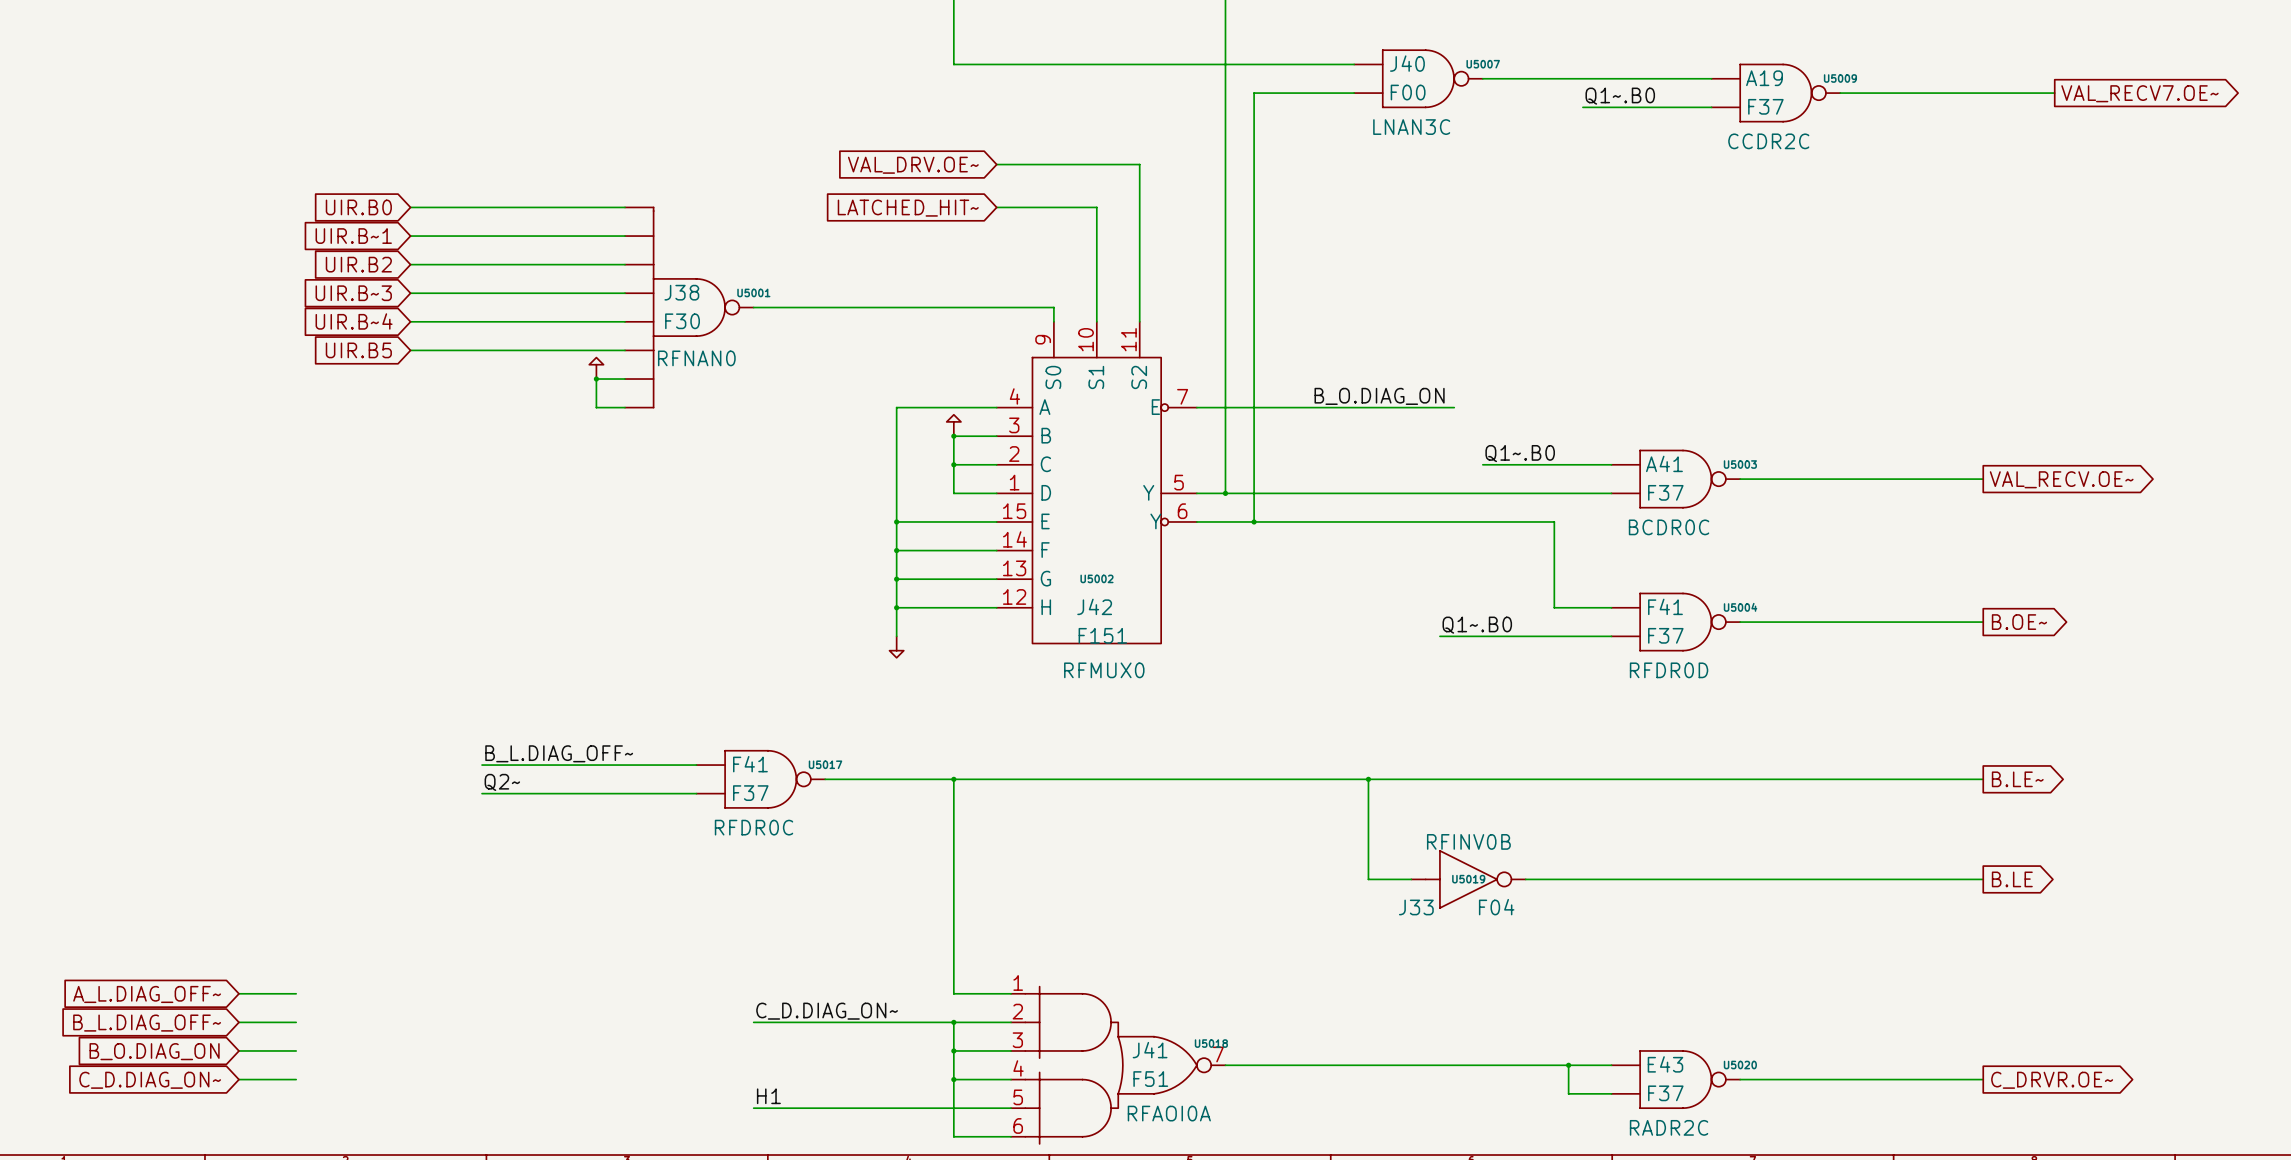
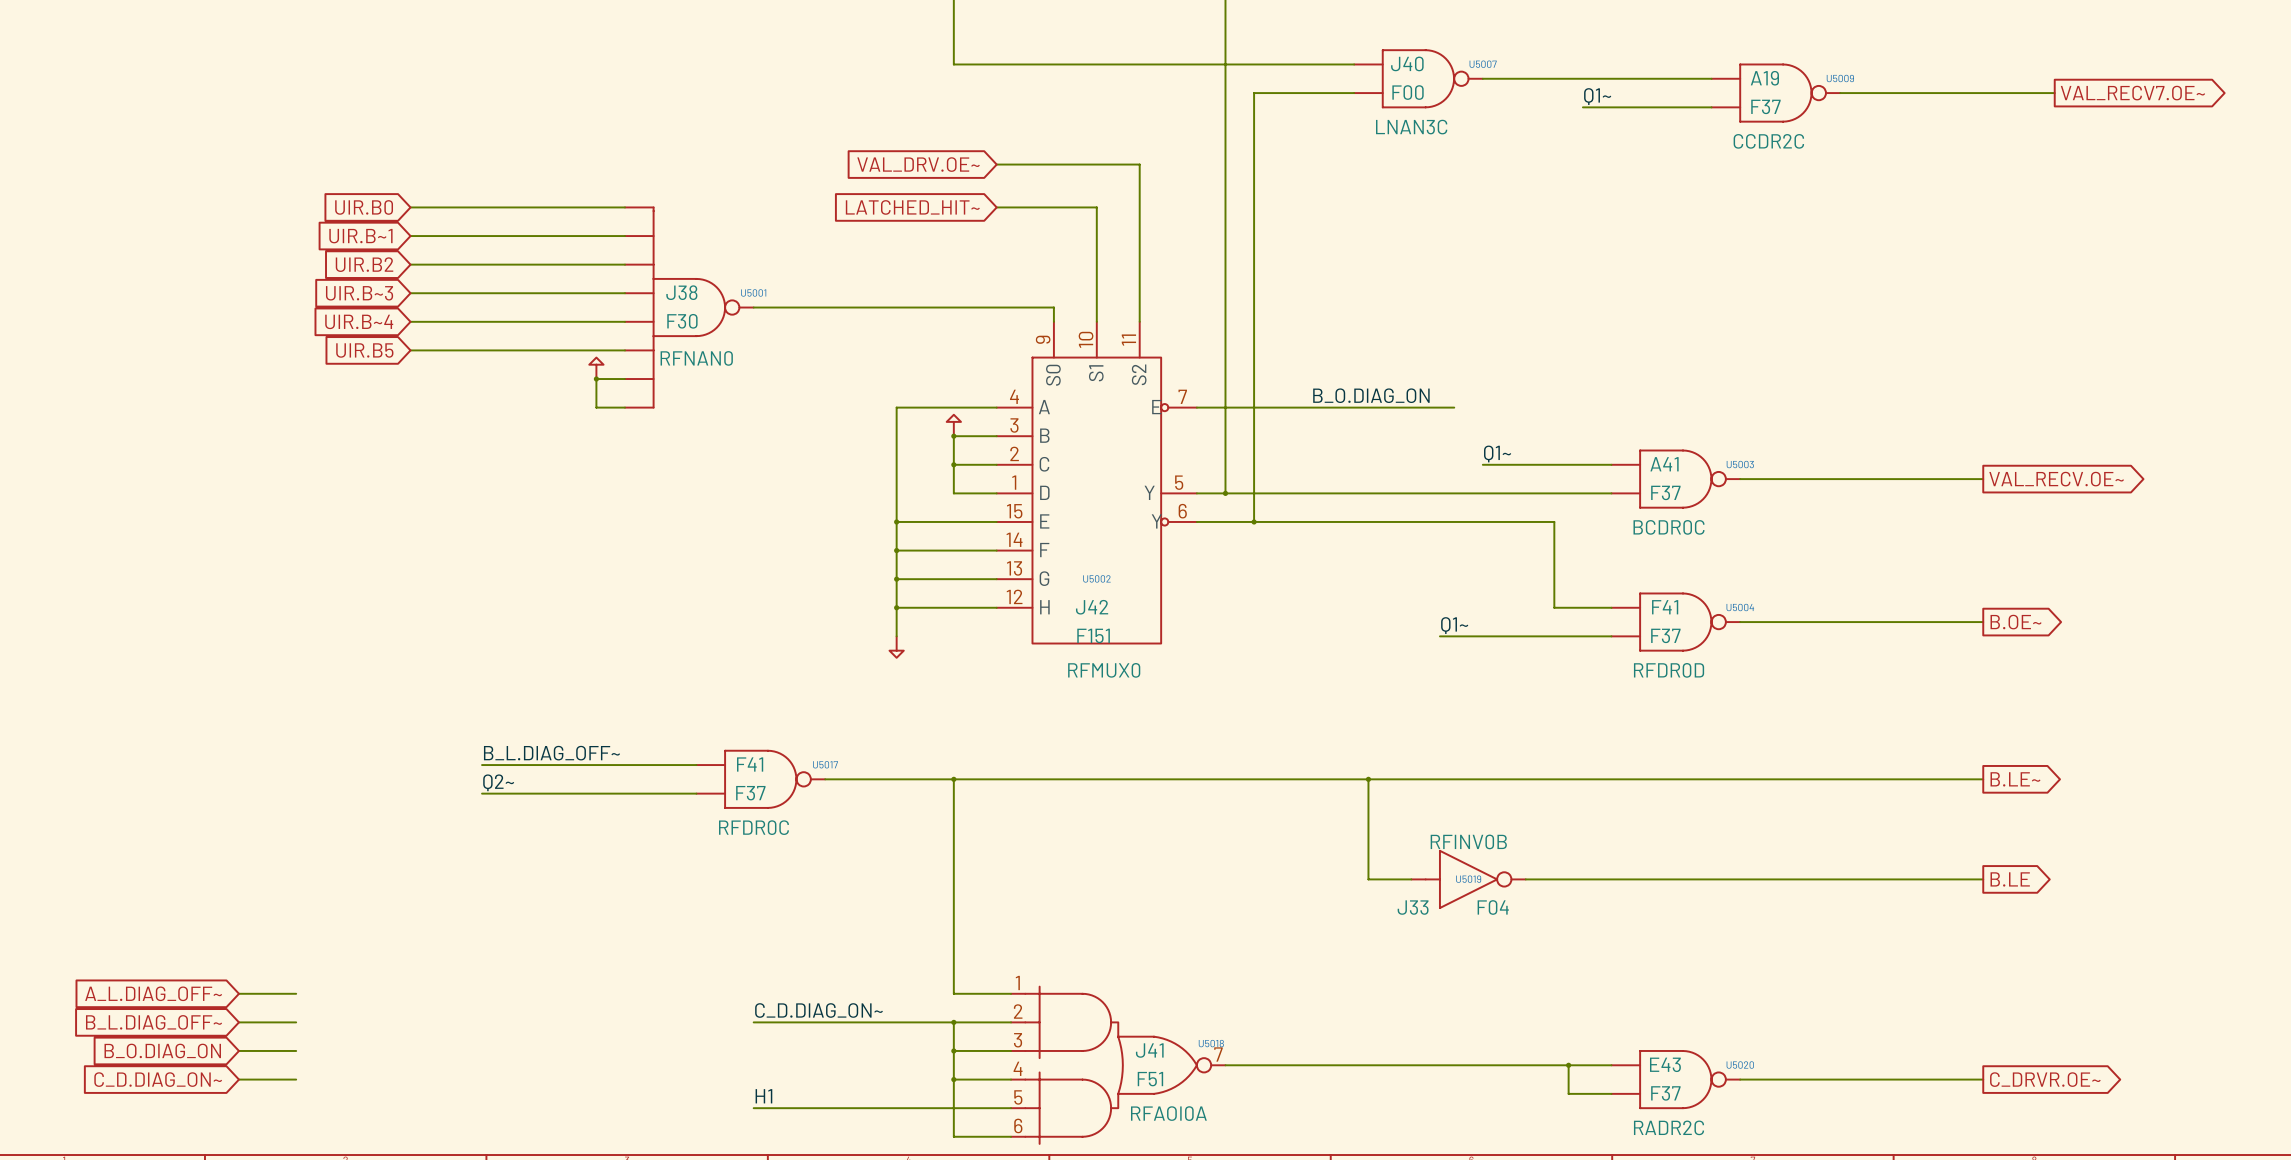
label: Q1~.B0 (1620, 96) -> Q1~ (1597, 96)
label: Q1~.B0 (1520, 453) -> Q1~ (1497, 453)
label: Q1~.B0 (1477, 625) -> Q1~ (1454, 625)

